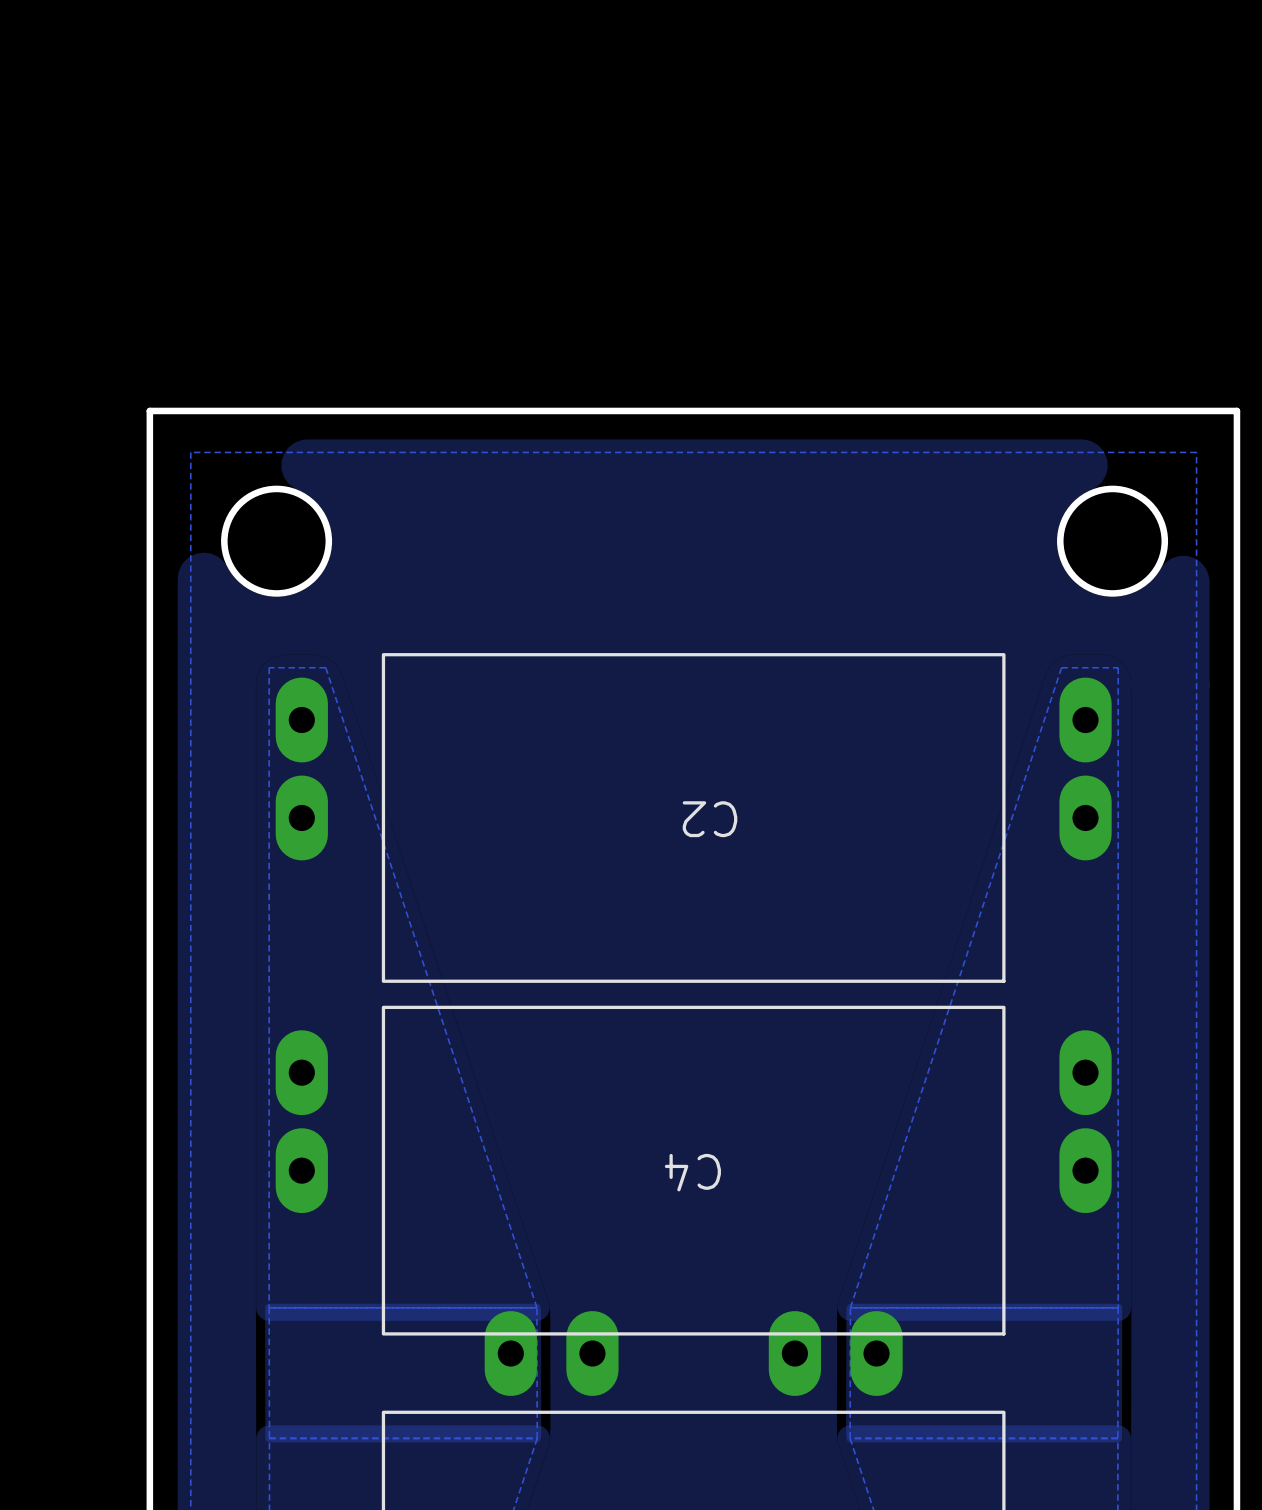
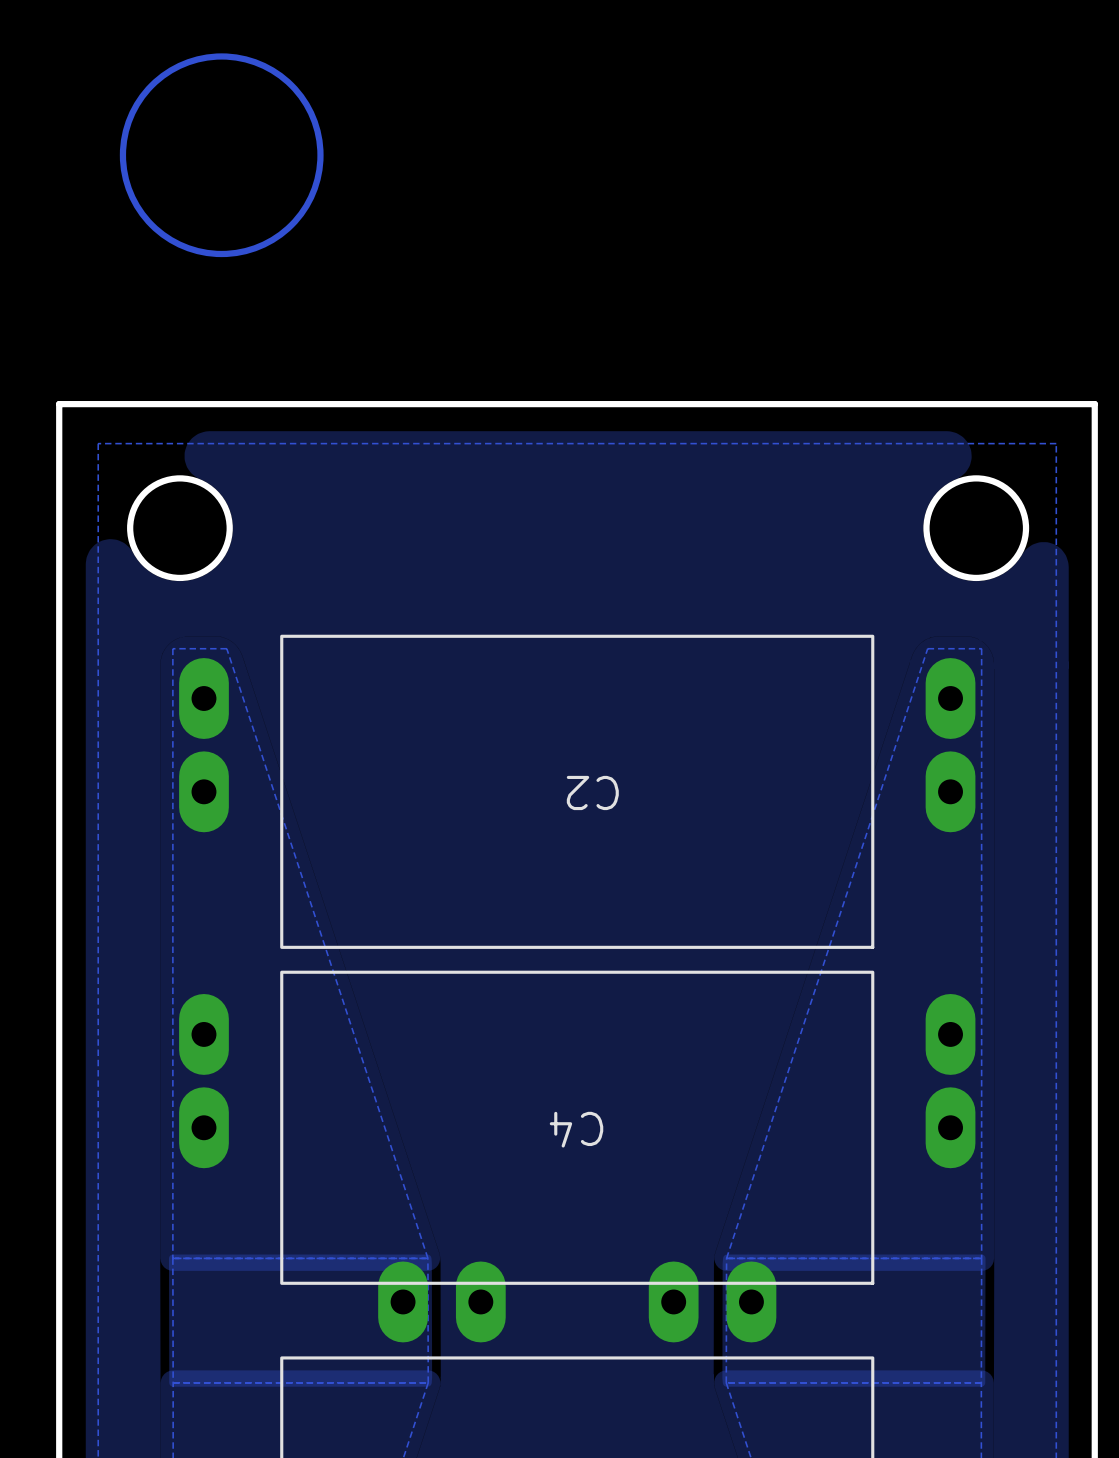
drawing: none -> [119, 53, 324, 258]

